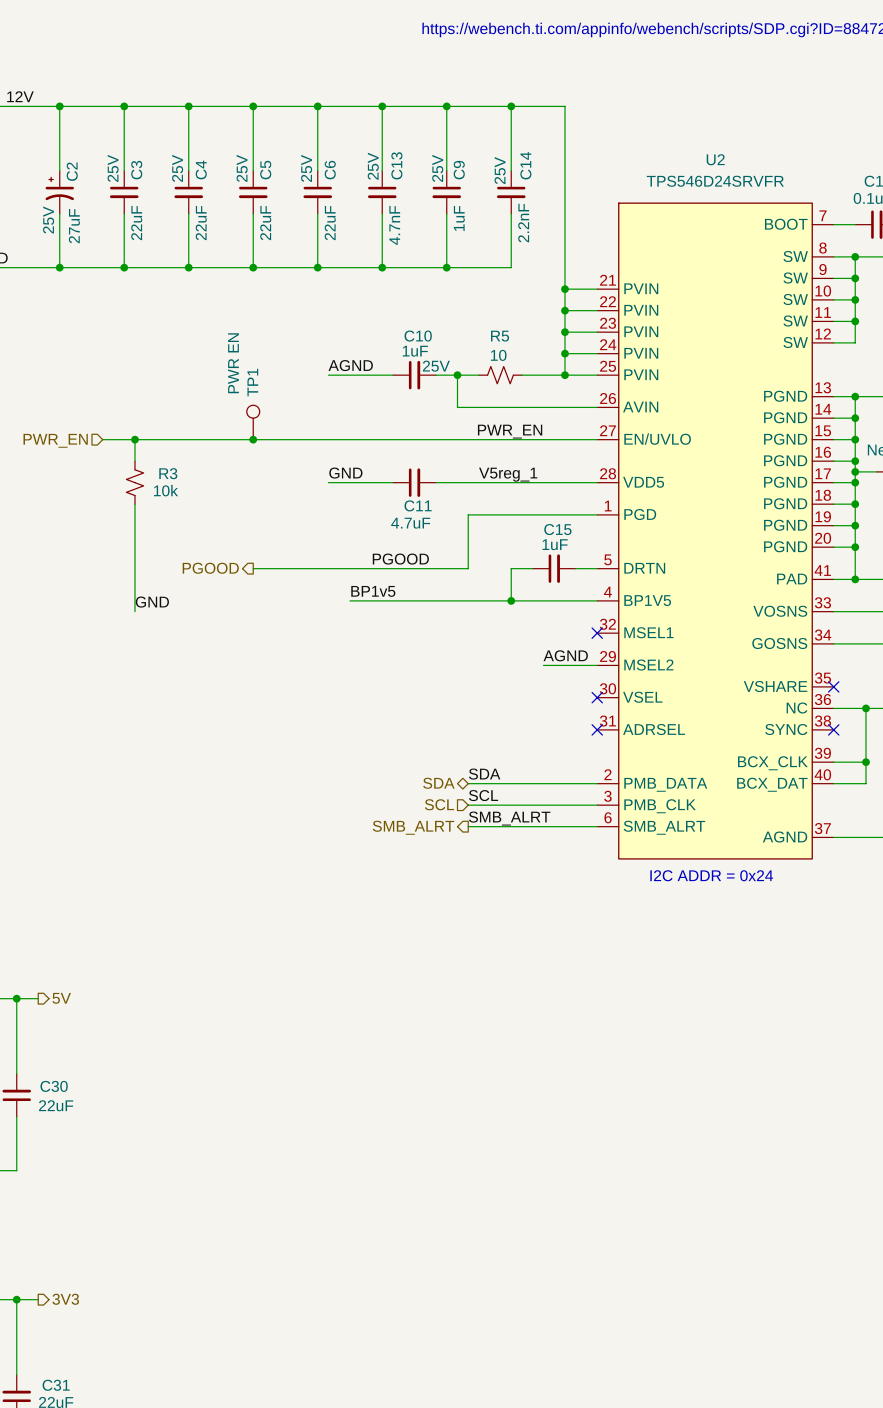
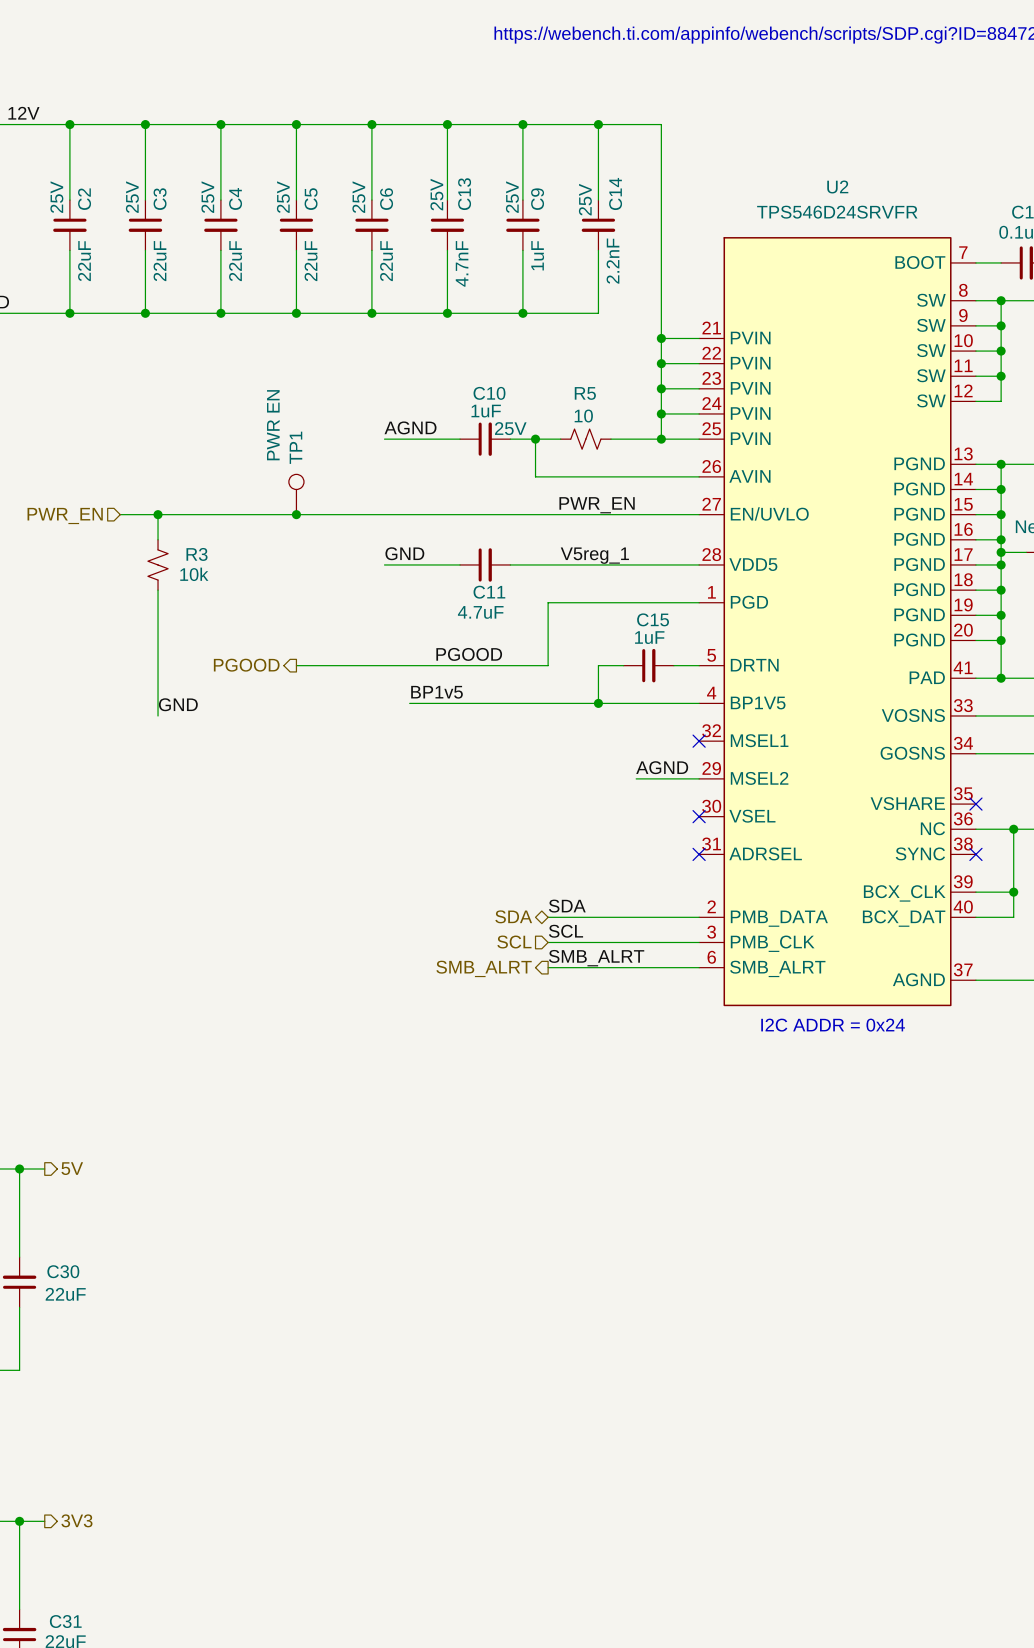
C2 symbol: [45, 170, 74, 214] -> [53, 200, 87, 251]
C2 text position: 25V (48, 220) -> 25V (56, 197)
C2 value: 27uF (74, 226) -> 22uF (84, 261)

